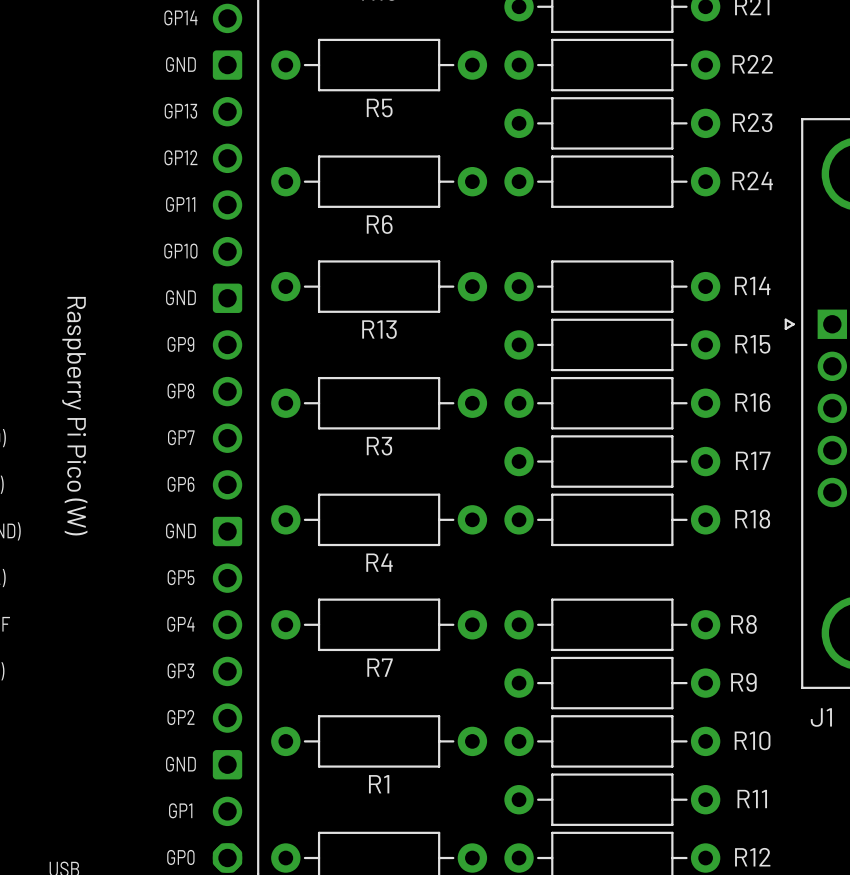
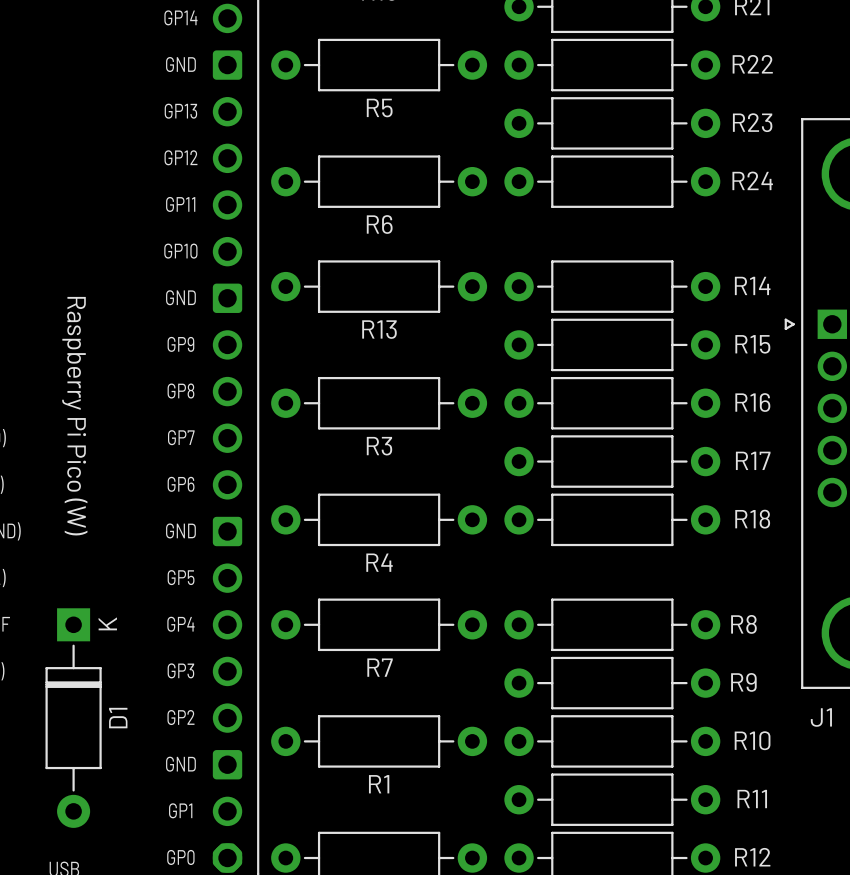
D1: none -> (73, 718)

